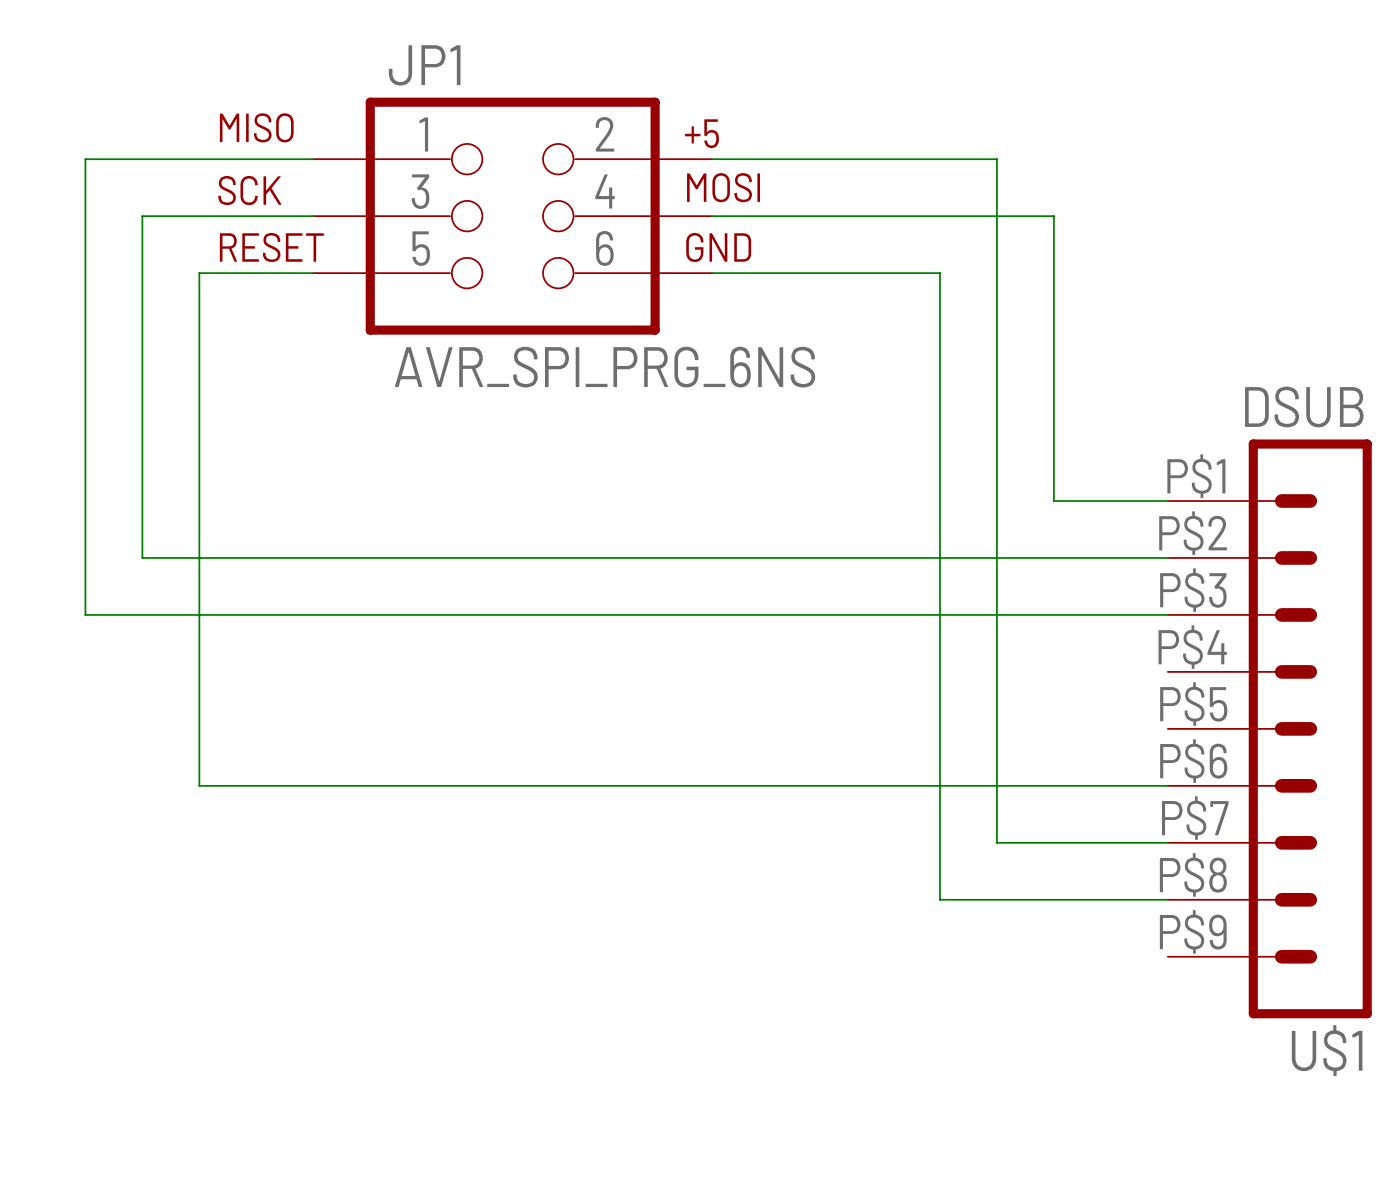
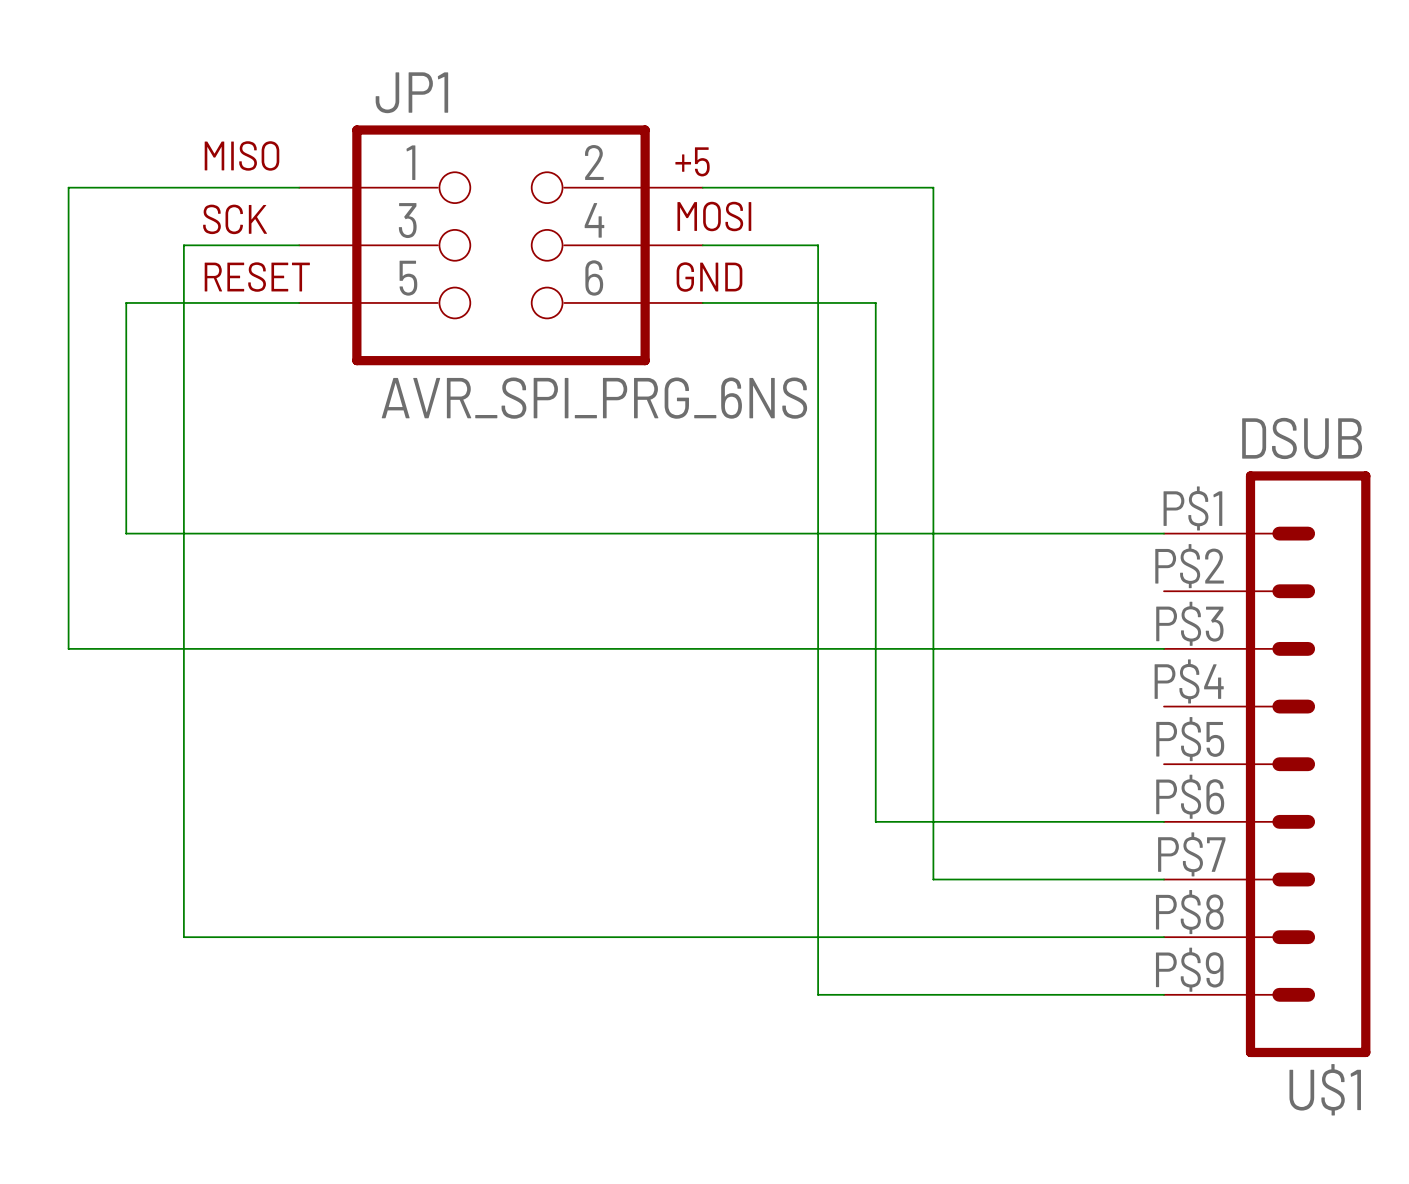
wire: (939, 159) (996, 159) (996, 842) -> none
wire: (199, 216) (142, 216) (142, 273) -> (183, 245) (183, 302) (126, 302)
wire: (826, 216) (1053, 216) (1053, 501) -> (818, 245) (818, 994) (1164, 994)
wire: (882, 273) (939, 273) -> (933, 187) (933, 302)
wire: none -> (875, 302) (875, 821)
wire: (142, 501) (142, 557) (1167, 557) -> (126, 533) (1048, 533)
wire: (199, 785) (882, 785) -> (183, 821) (183, 937) (933, 937)
wire: (939, 842) (939, 899) -> (933, 879) (991, 879)

